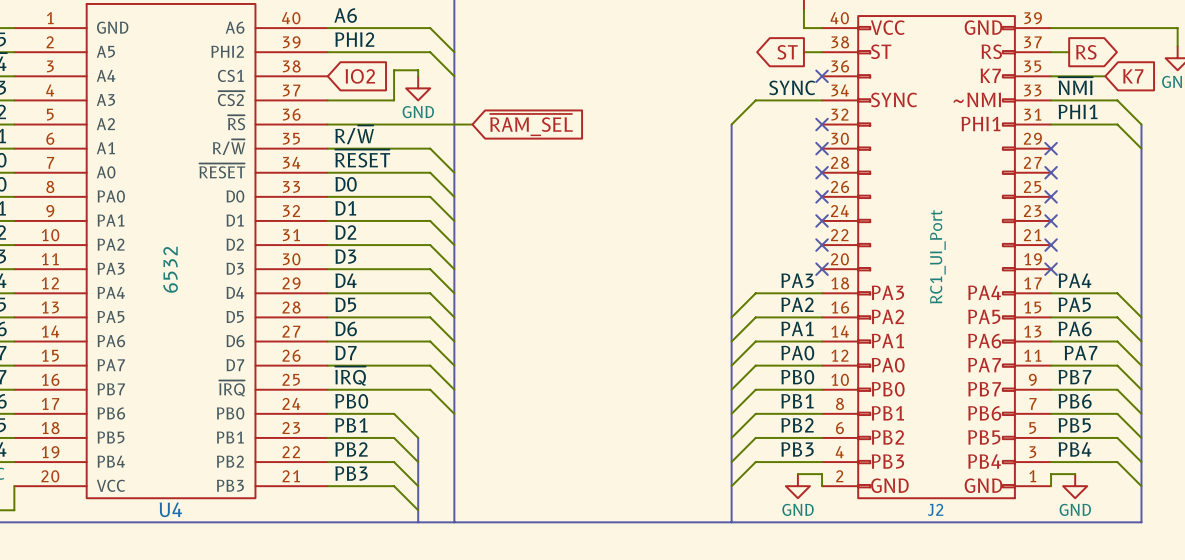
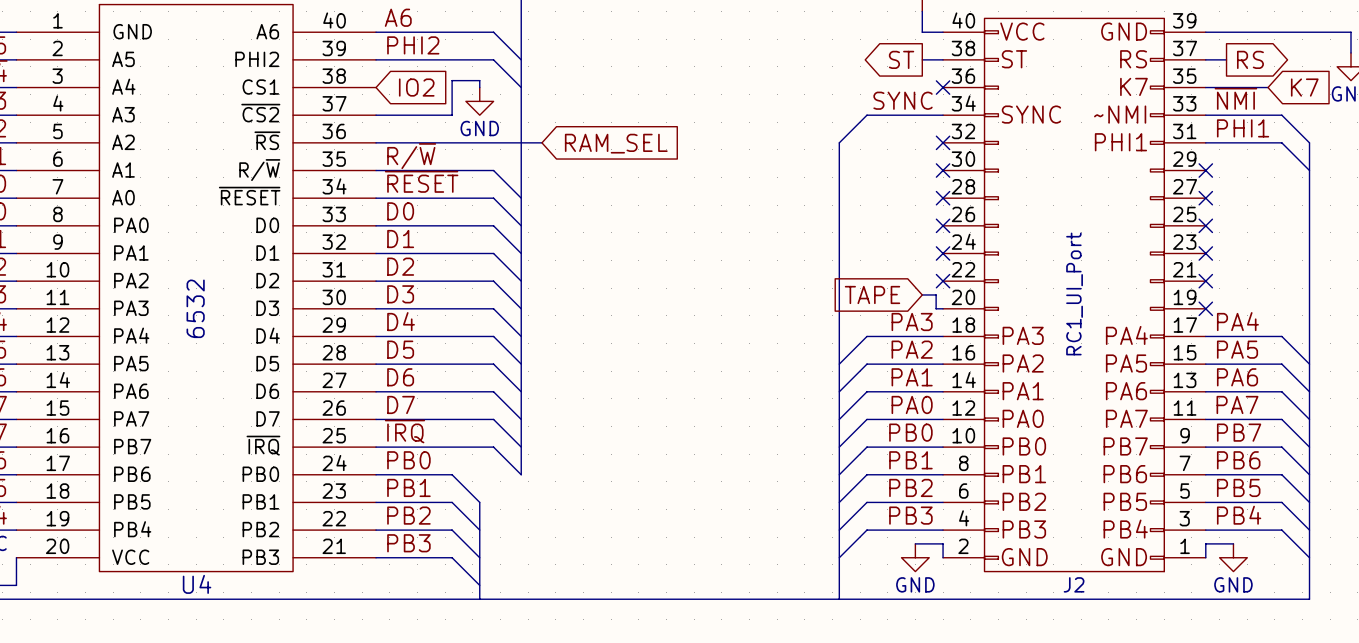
global label: ~{RAM_SEL} (531, 125) -> RAM_SEL (616, 143)
global label: none -> TAPE (872, 294)
wire: none -> (922, 294) (936, 294) (936, 308) (943, 308)
no-connect mark: (822, 269) -> none
bus: (454, 413) (454, 522) -> none

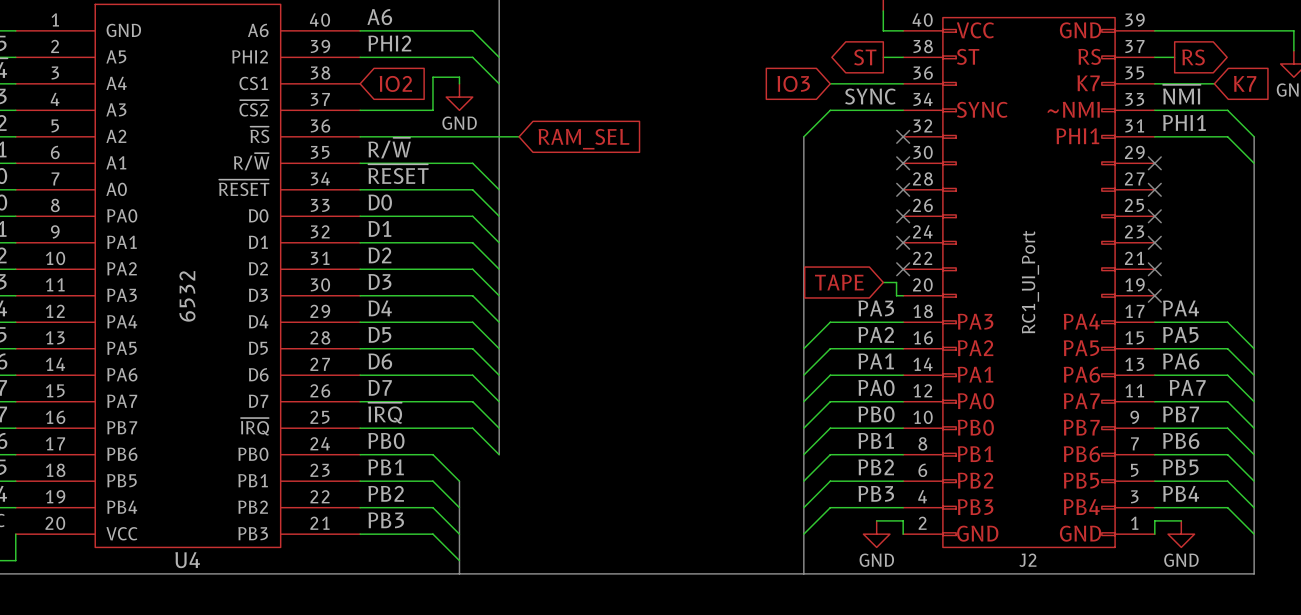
global label: none -> IO3 (793, 83)
wire: none -> (830, 83) (903, 83)
no-connect mark: (943, 87) -> none

